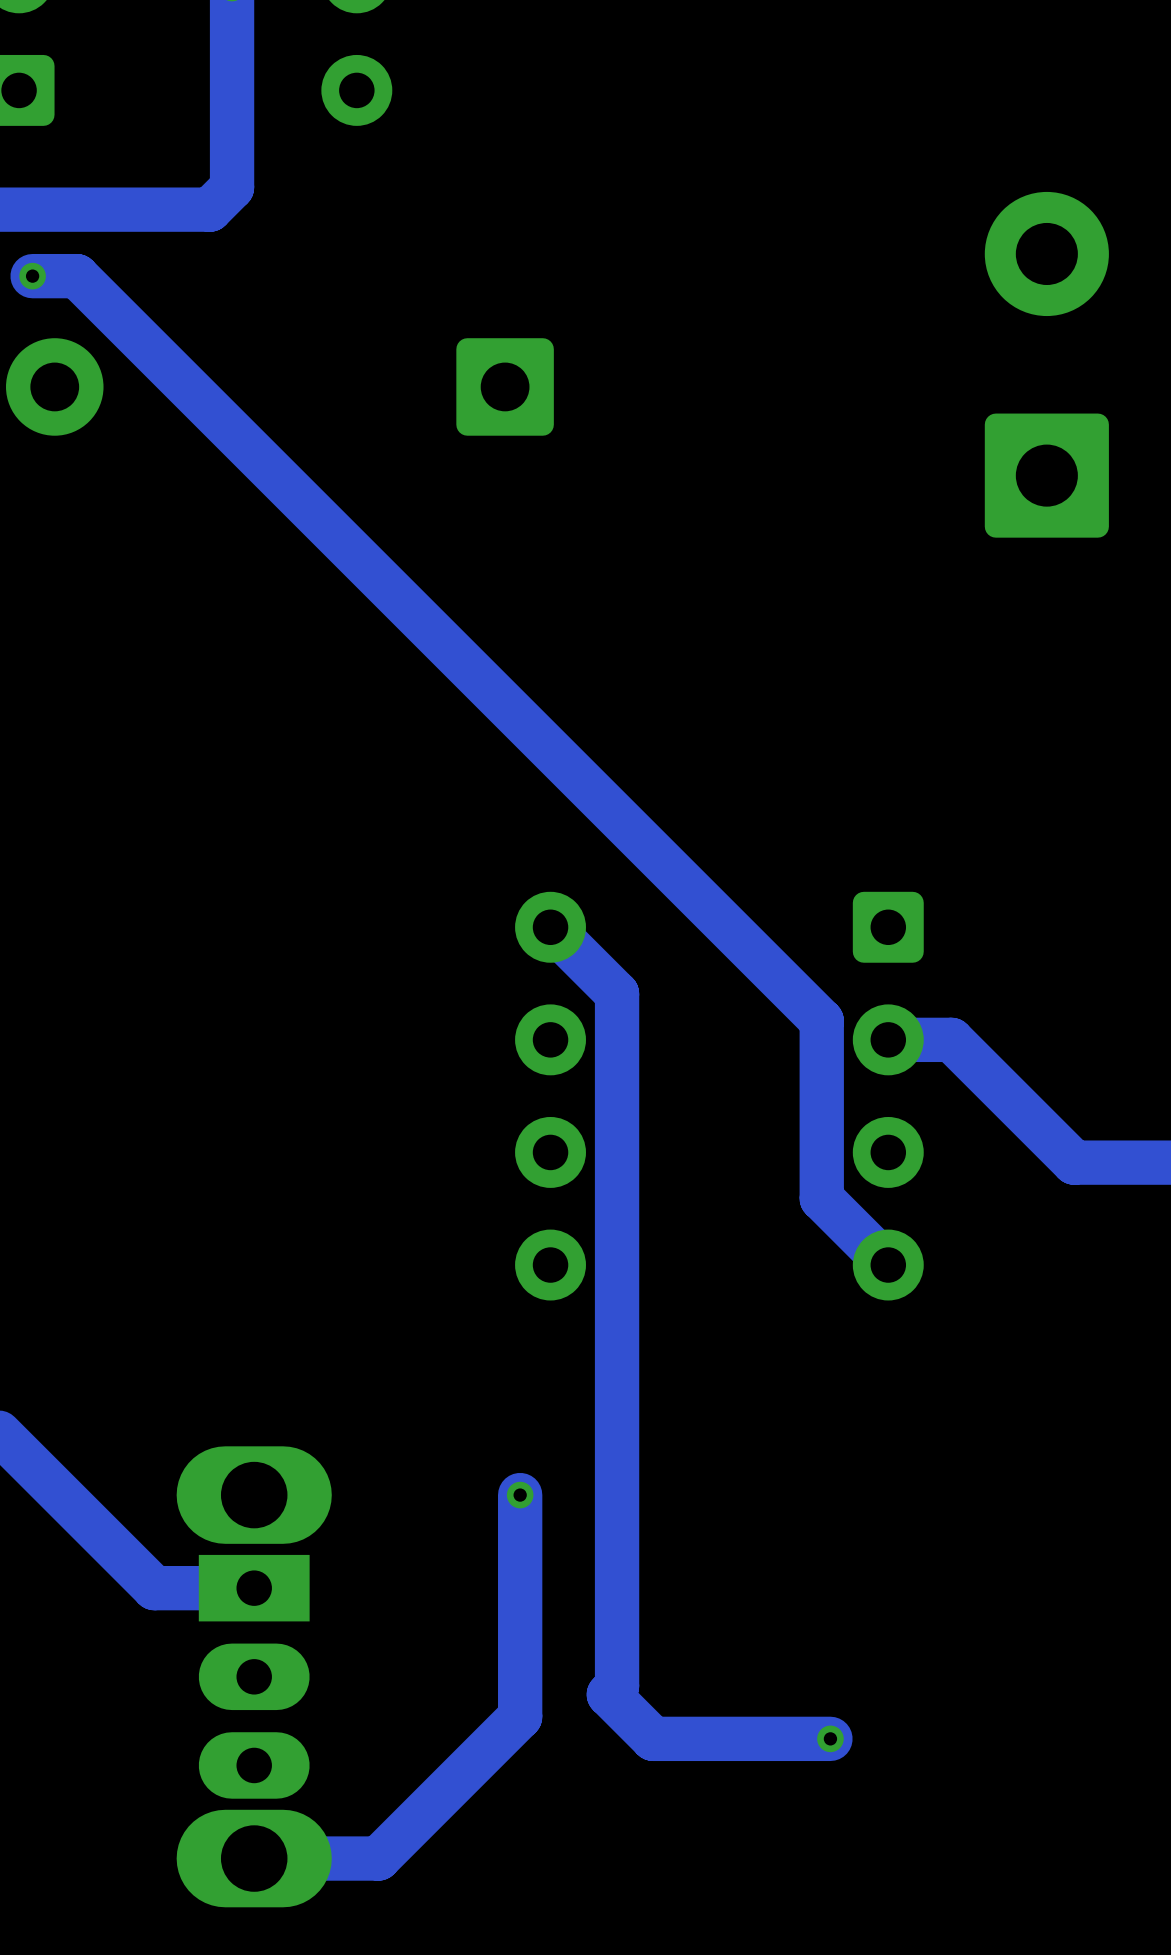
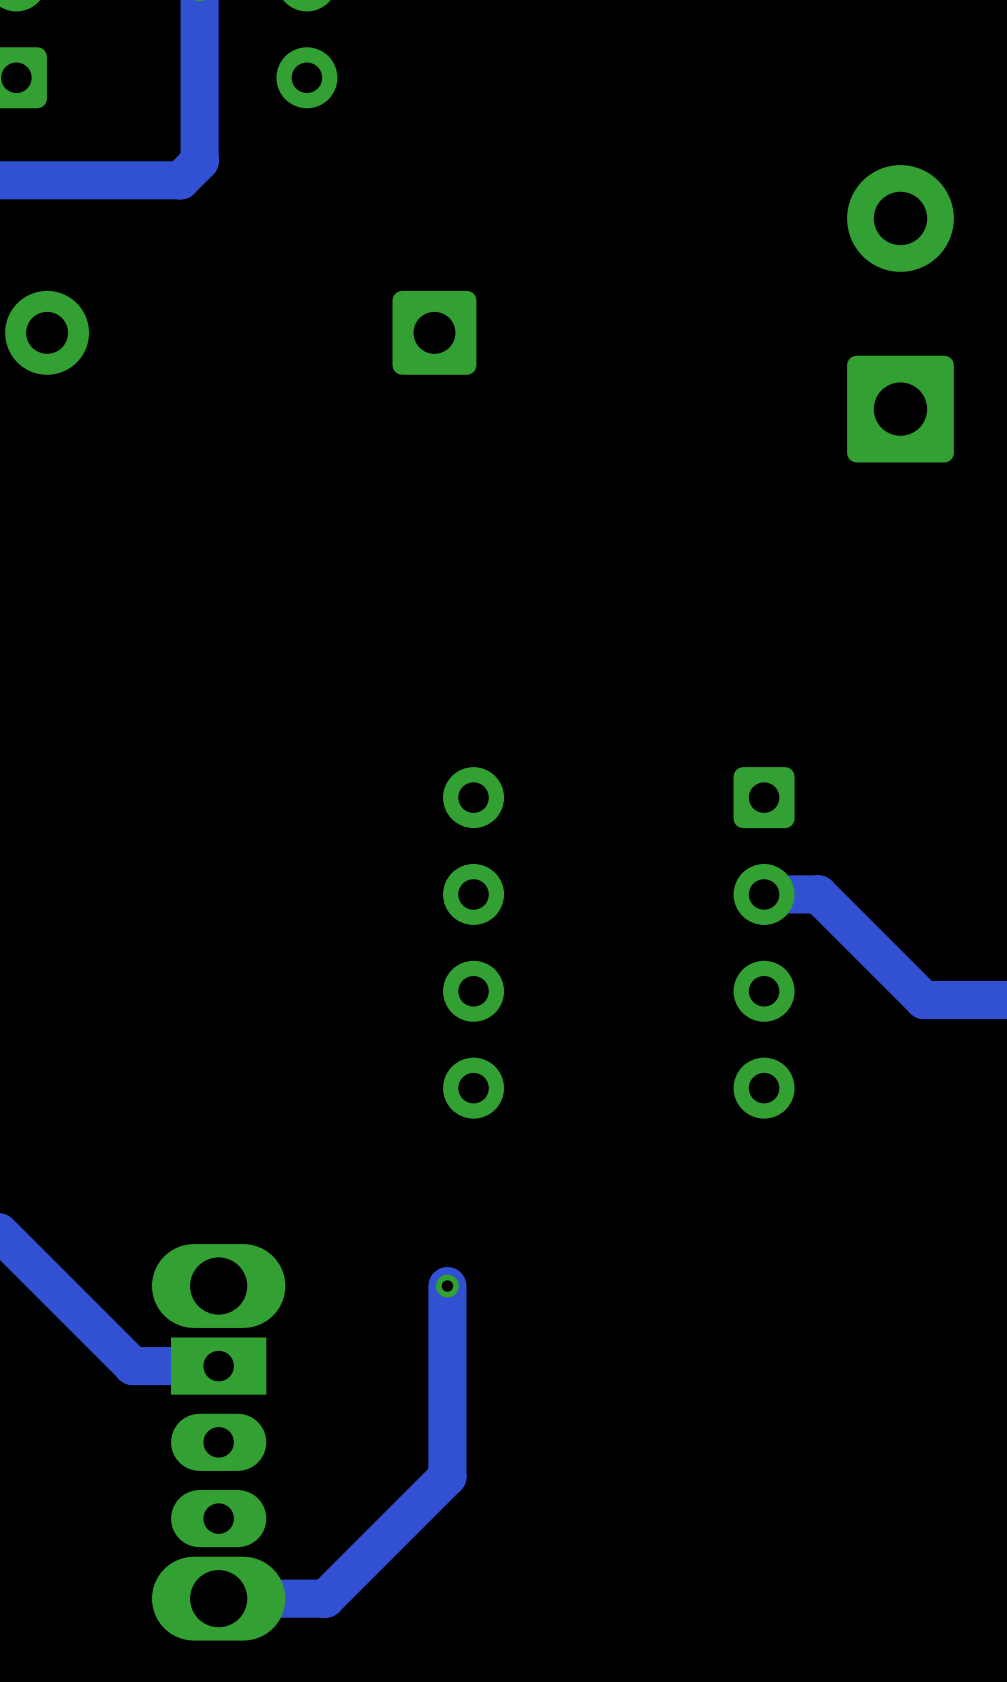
track: (32, 276) (76, 276) (821, 1020) (821, 1198) (888, 1265) -> none
via: (32, 276) -> none
track: (550, 927) (617, 993) (617, 1686) (608, 1694) (653, 1738) (830, 1738) -> none
via: (830, 1738) -> none

